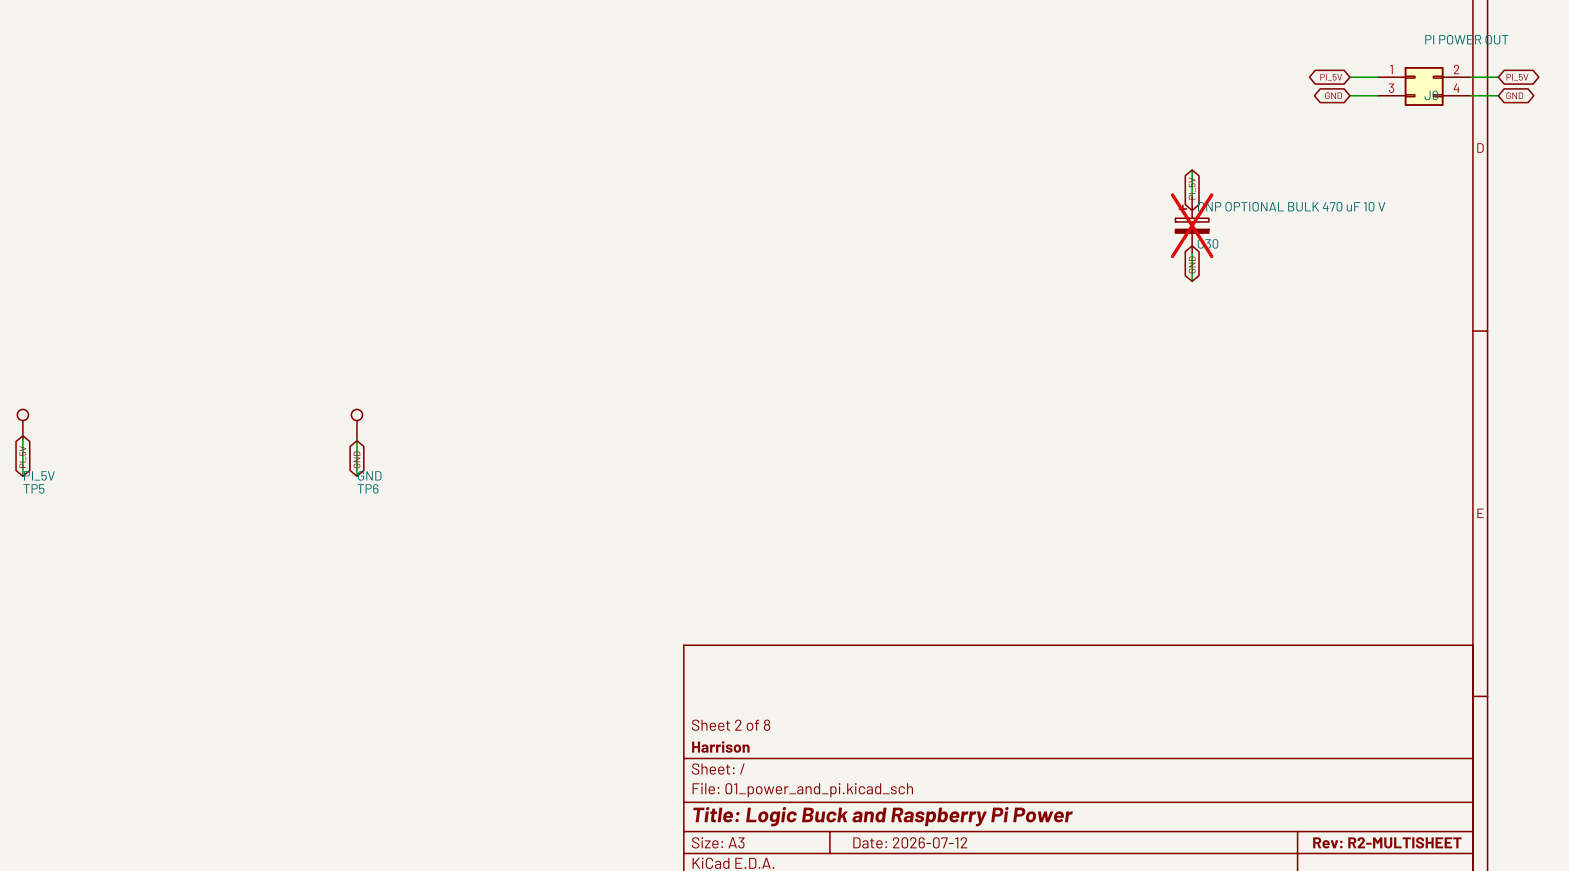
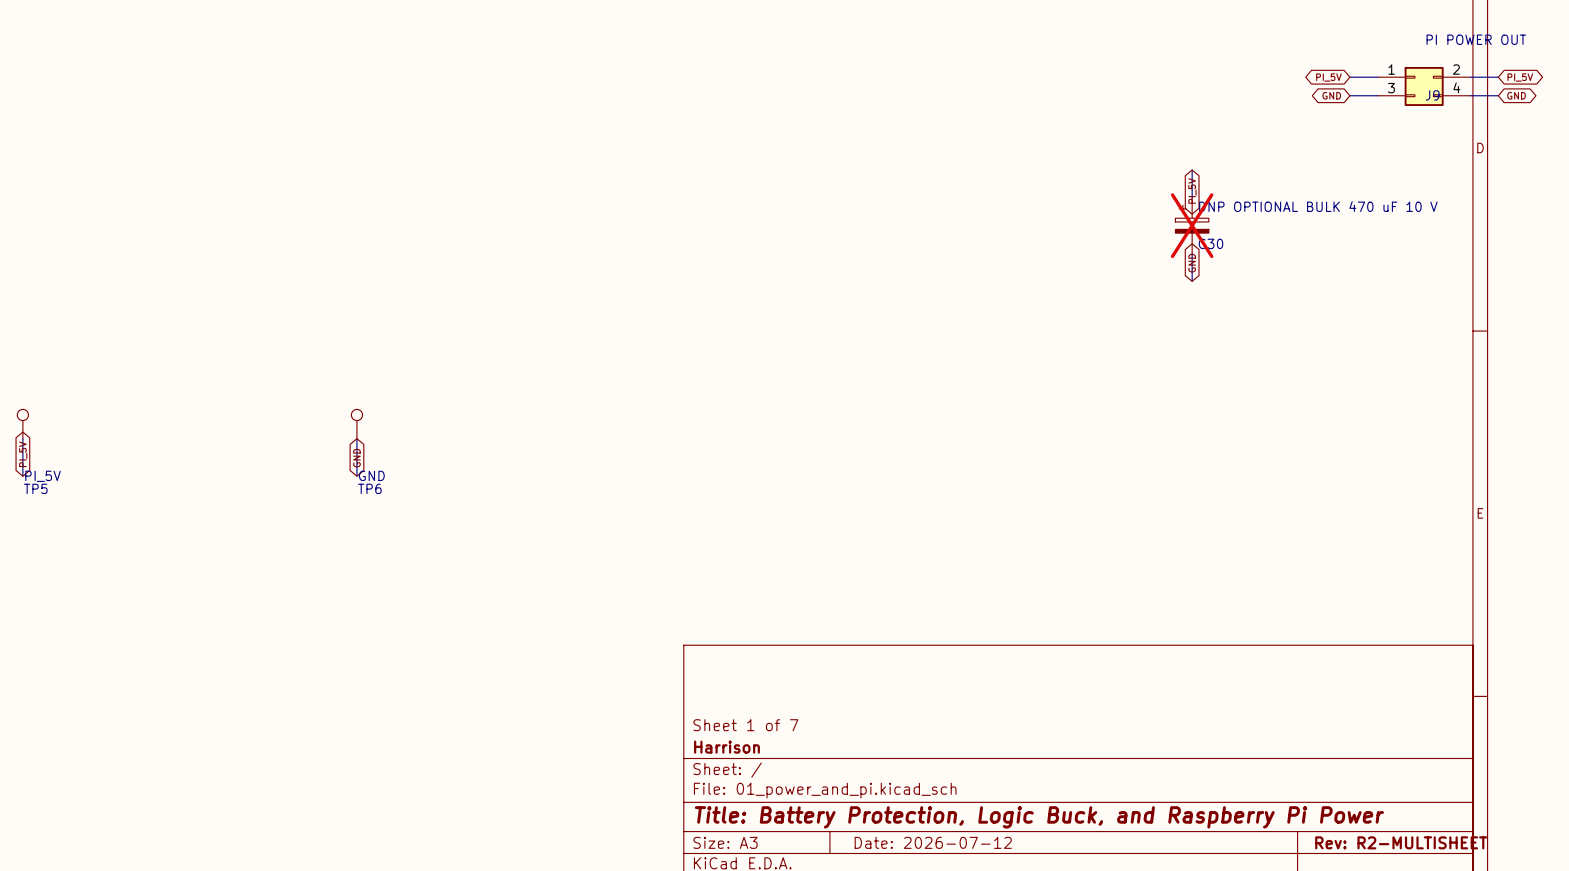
title block: Sheet 2 of 8 (731, 725) -> Sheet 1 of 7 (745, 725)
title block: Title: Logic Buck and Raspberry Pi Power (883, 816) -> Title: Battery Protection, Logic Buck, and Raspberry Pi Power (1039, 817)

